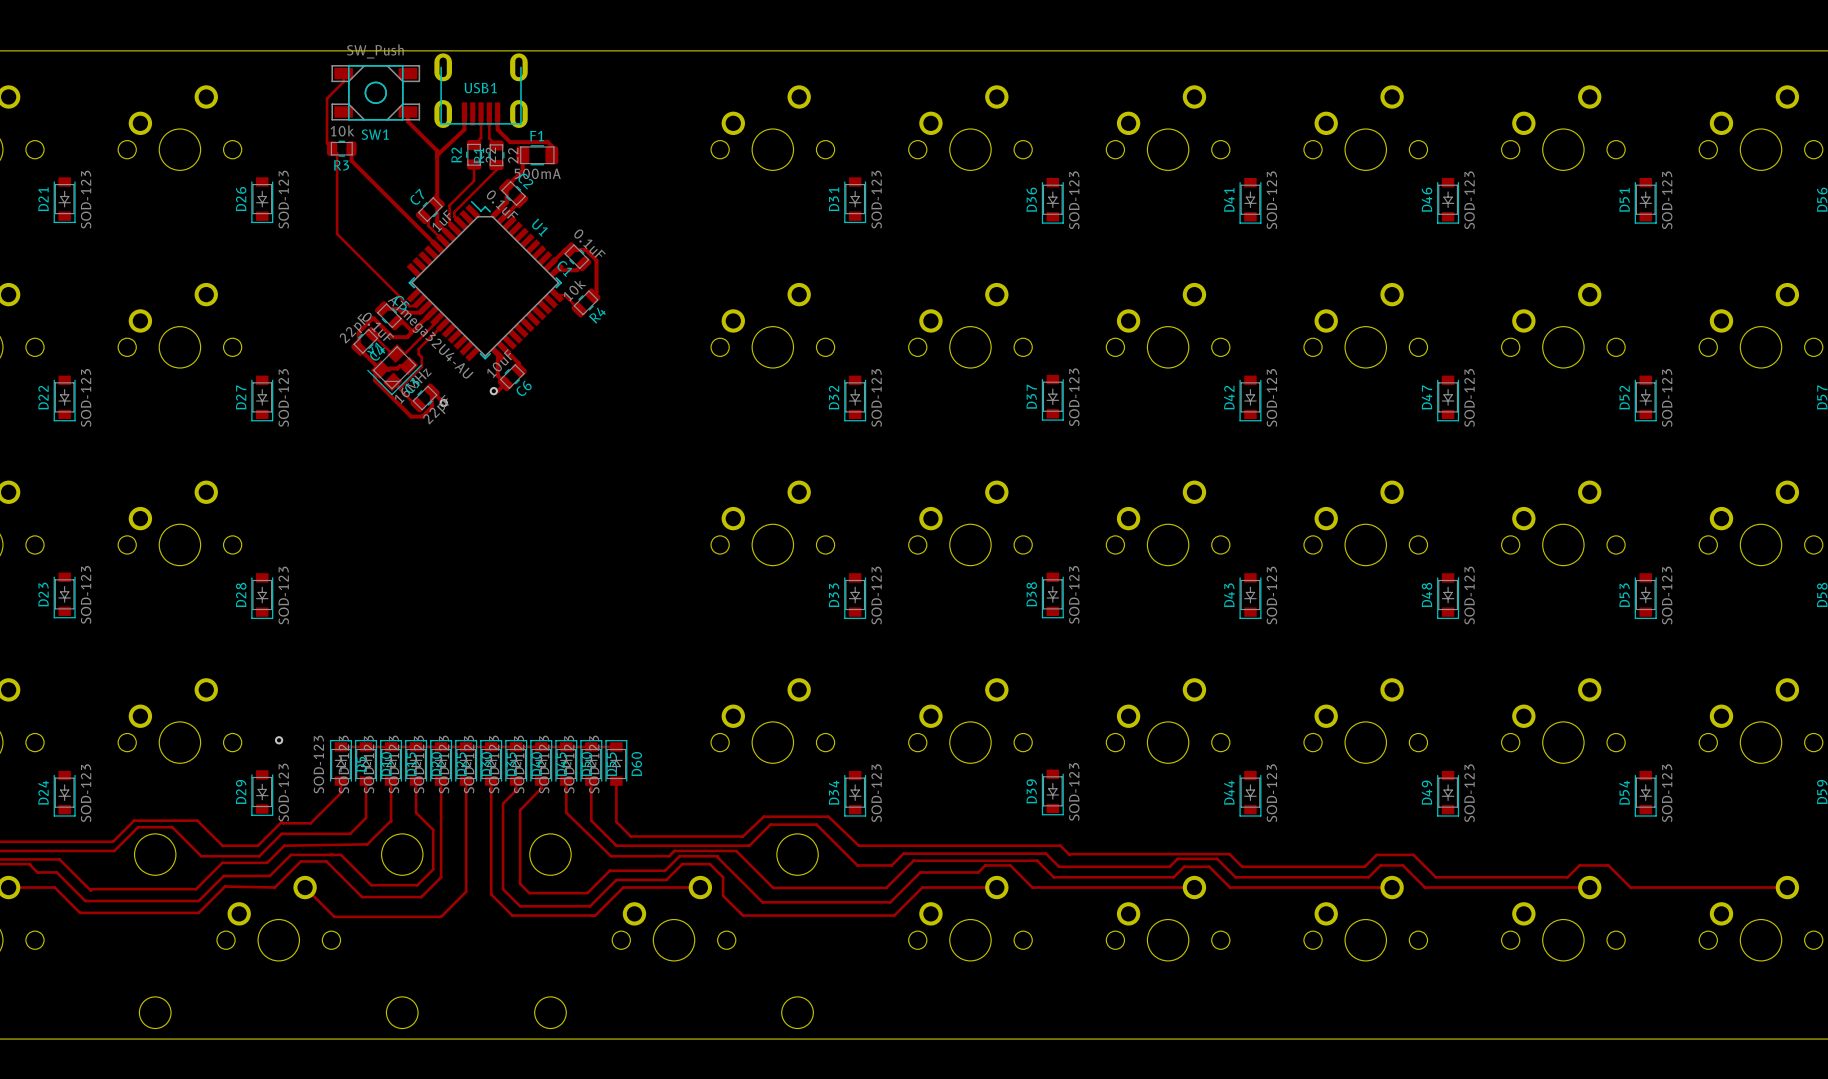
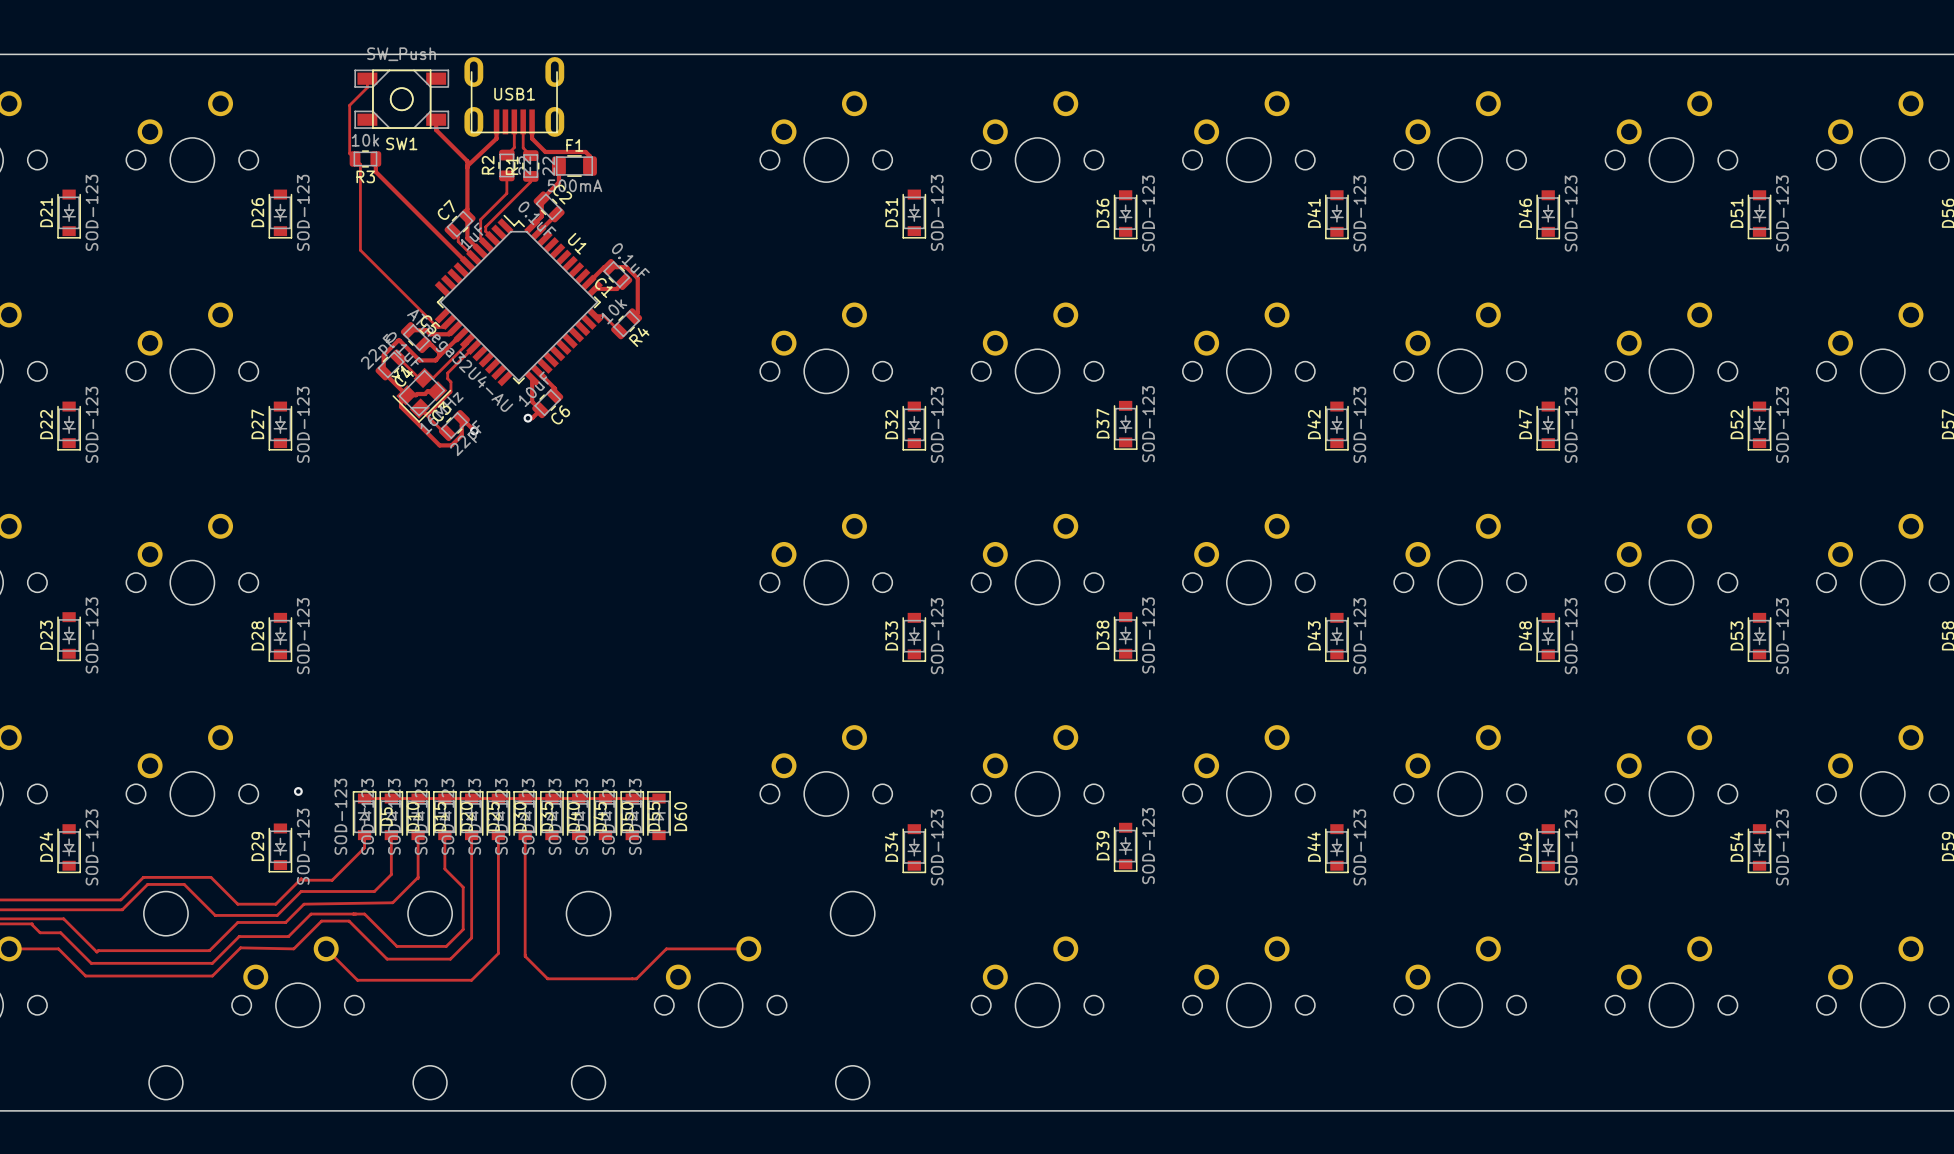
track: (516, 781) (516, 790) (503, 803) (503, 889) (520, 906) (590, 906) (616, 879) (666, 879) (682, 864) (709, 864) (723, 877) (723, 895) (742, 915) (894, 915) (922, 887) (996, 887) -> none
track: (541, 781) (541, 788) (520, 810) (520, 883) (529, 893) (587, 893) (609, 870) (665, 870) (679, 856) (717, 856) (762, 902) (890, 902) (920, 872) (978, 872) (985, 865) (1010, 865) (1032, 887) (1194, 887) -> none
track: (566, 781) (566, 812) (611, 856) (669, 856) (674, 850) (736, 850) (773, 887) (886, 887) (913, 860) (1037, 860) (1053, 877) (1173, 877) (1184, 866) (1209, 866) (1230, 887) (1392, 887) -> none
track: (591, 781) (591, 820) (616, 845) (749, 845) (770, 824) (816, 824) (857, 865) (891, 865) (903, 853) (1045, 853) (1059, 866) (1169, 866) (1177, 858) (1217, 858) (1235, 877) (1368, 877) (1380, 865) (1402, 865) (1425, 887) (1589, 887) -> none
track: (616, 781) (616, 821) (630, 836) (742, 836) (763, 816) (828, 816) (858, 845) (1060, 845) (1069, 854) (1229, 854) (1242, 866) (1364, 866) (1376, 854) (1413, 854) (1435, 877) (1567, 877) (1579, 865) (1608, 865) (1630, 887) (1787, 887) -> none

